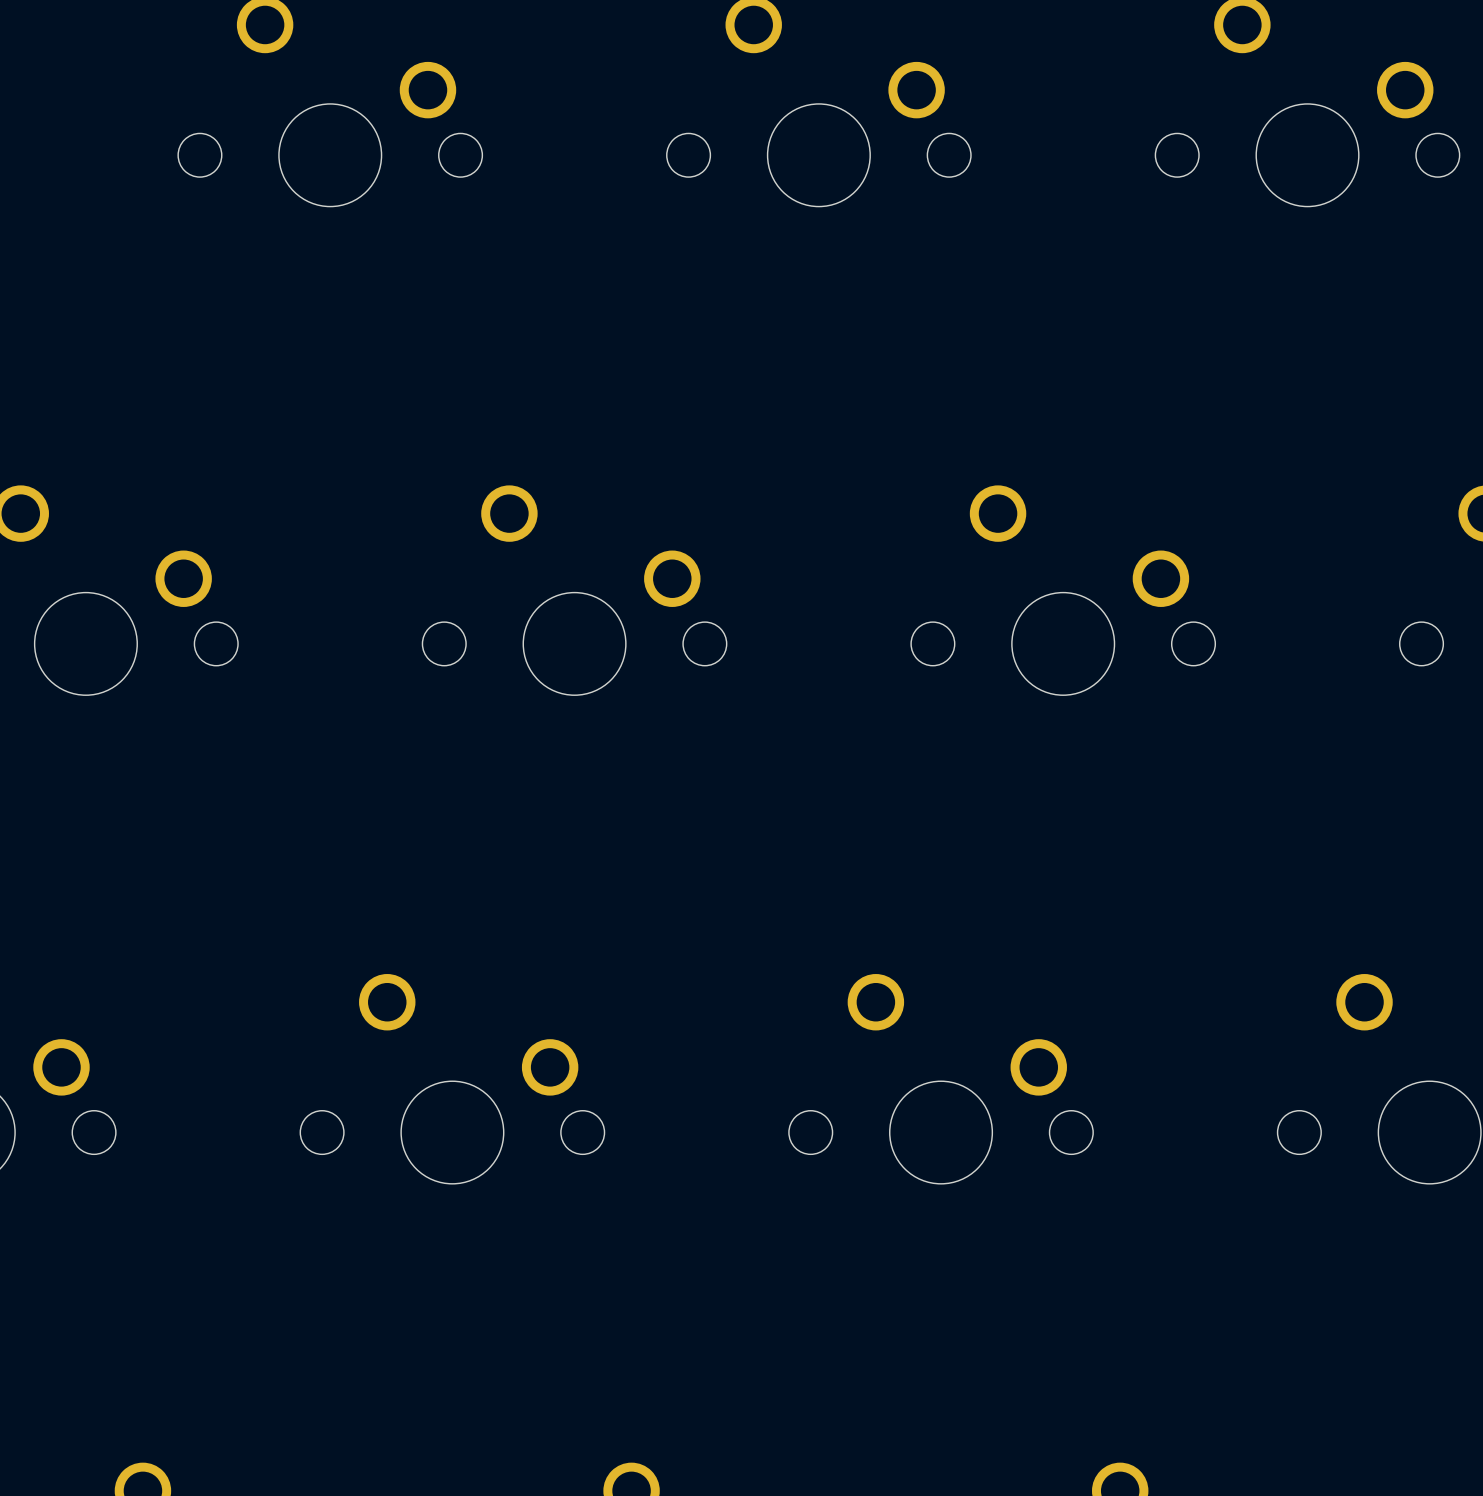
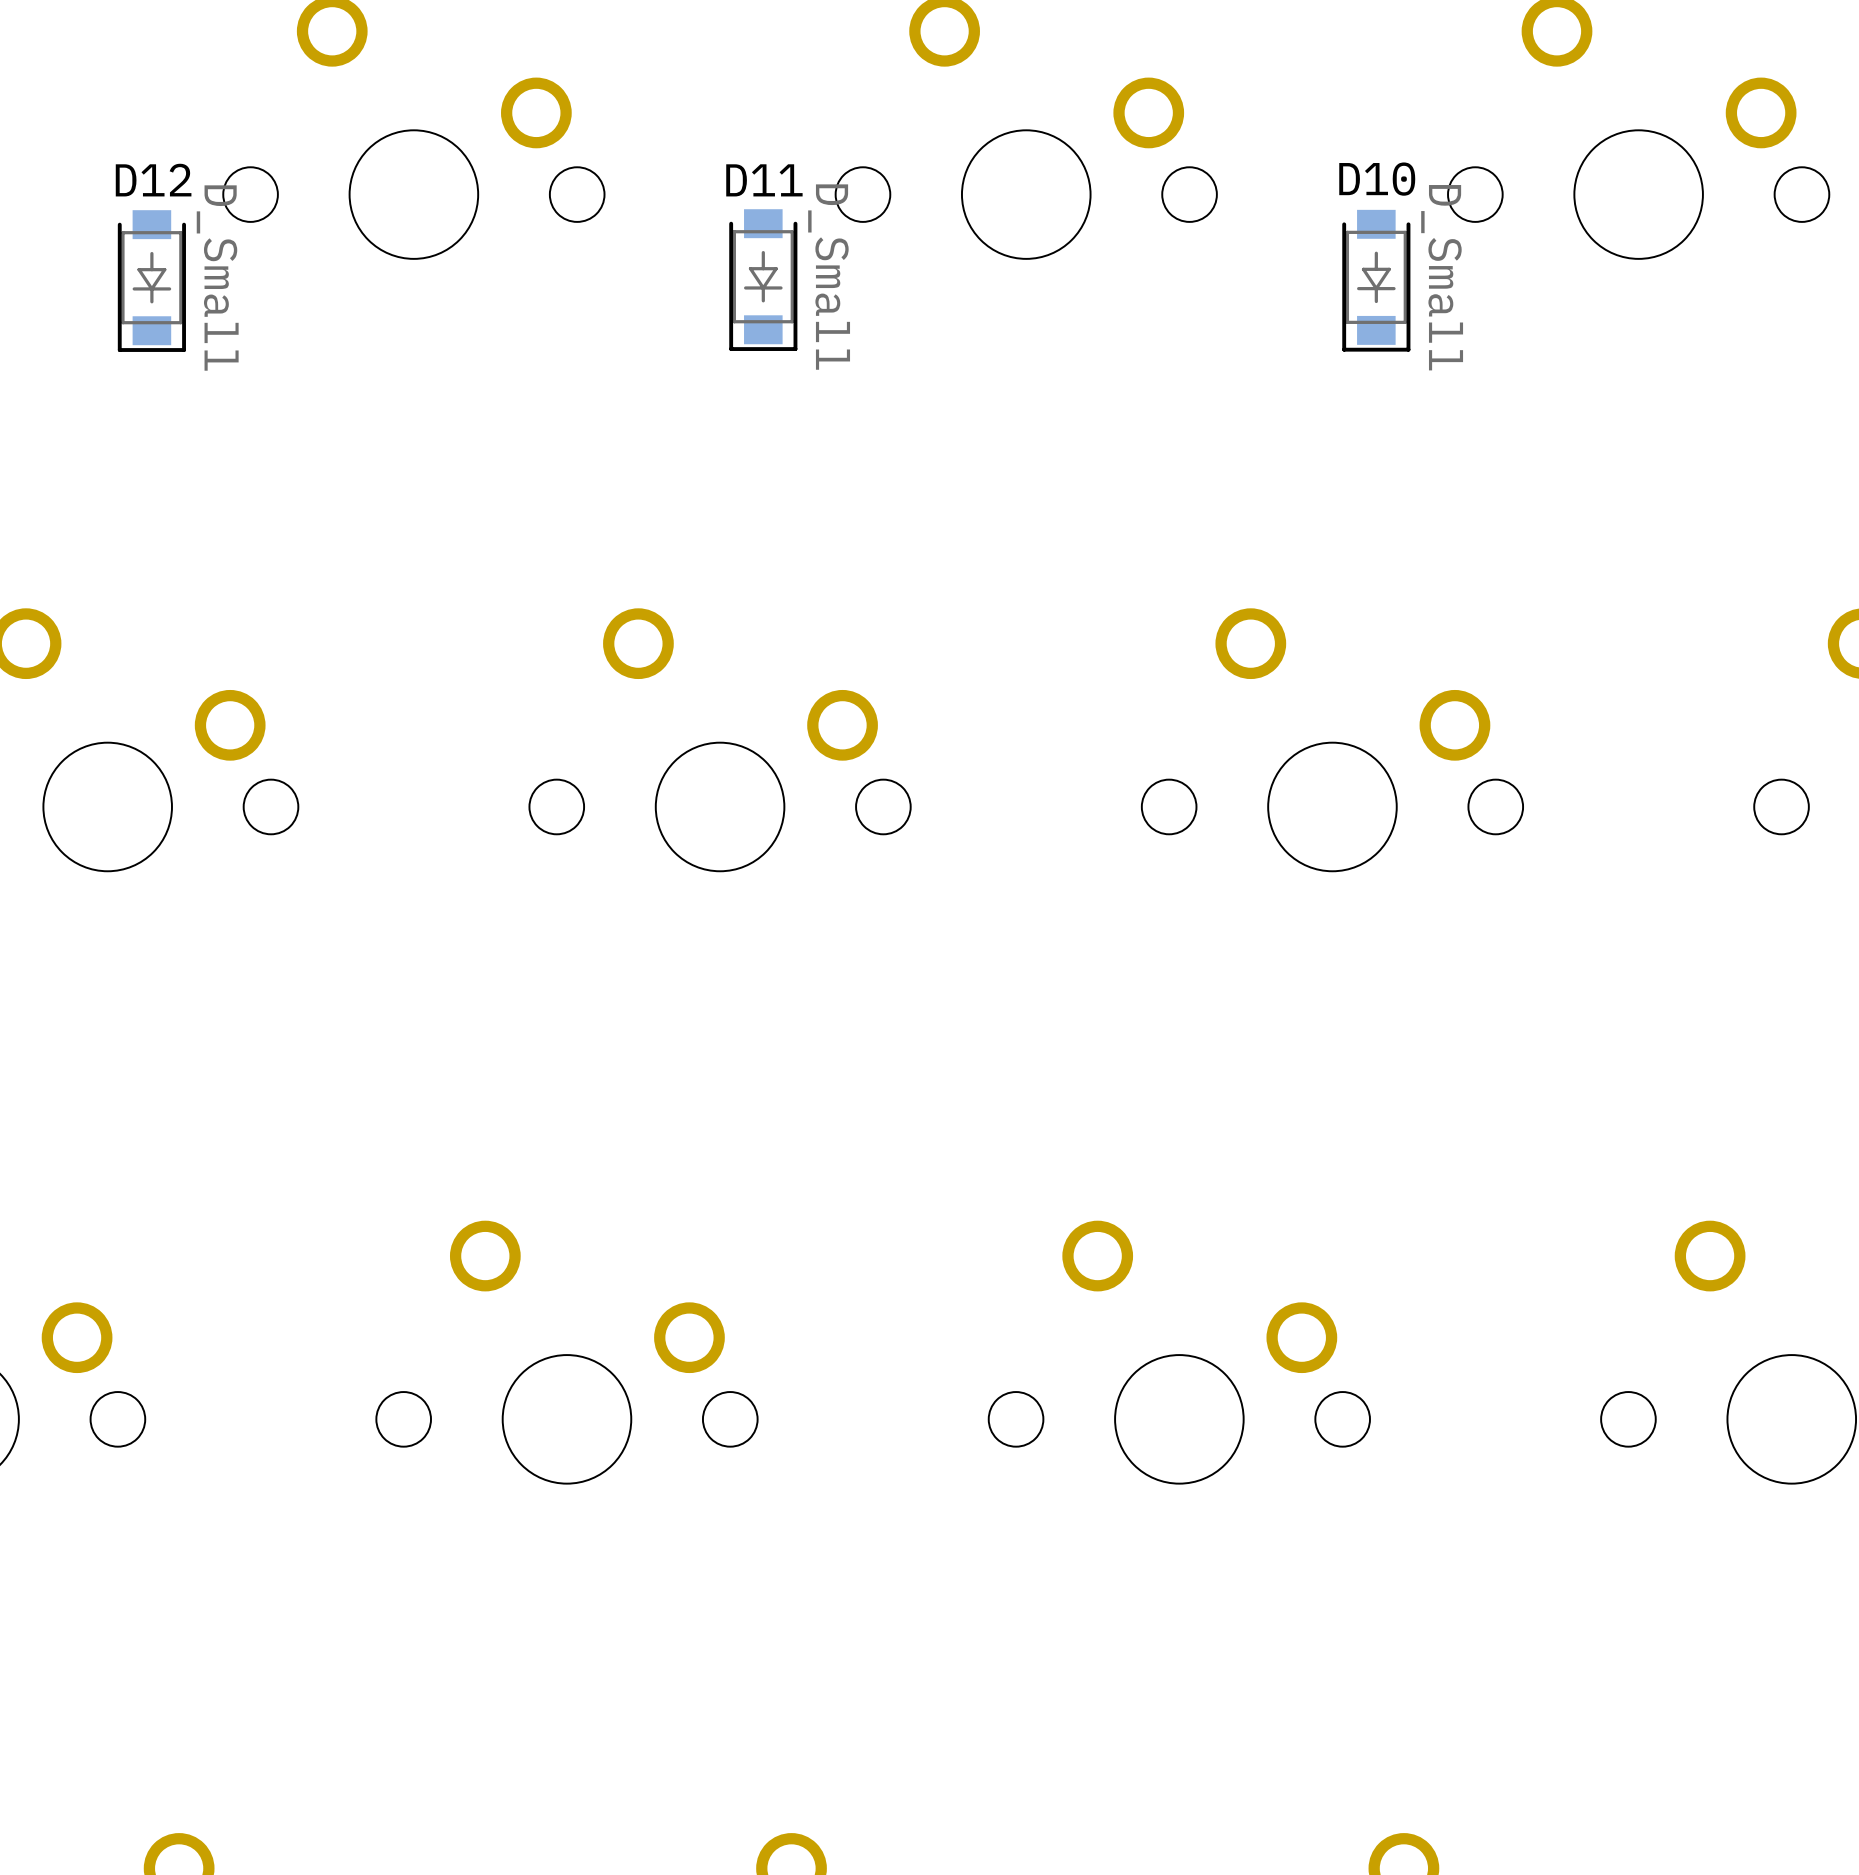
D11: none -> D_Small (763, 280)
D12: none -> D_Small (151, 281)
D10: none -> D_Small (1376, 280)

